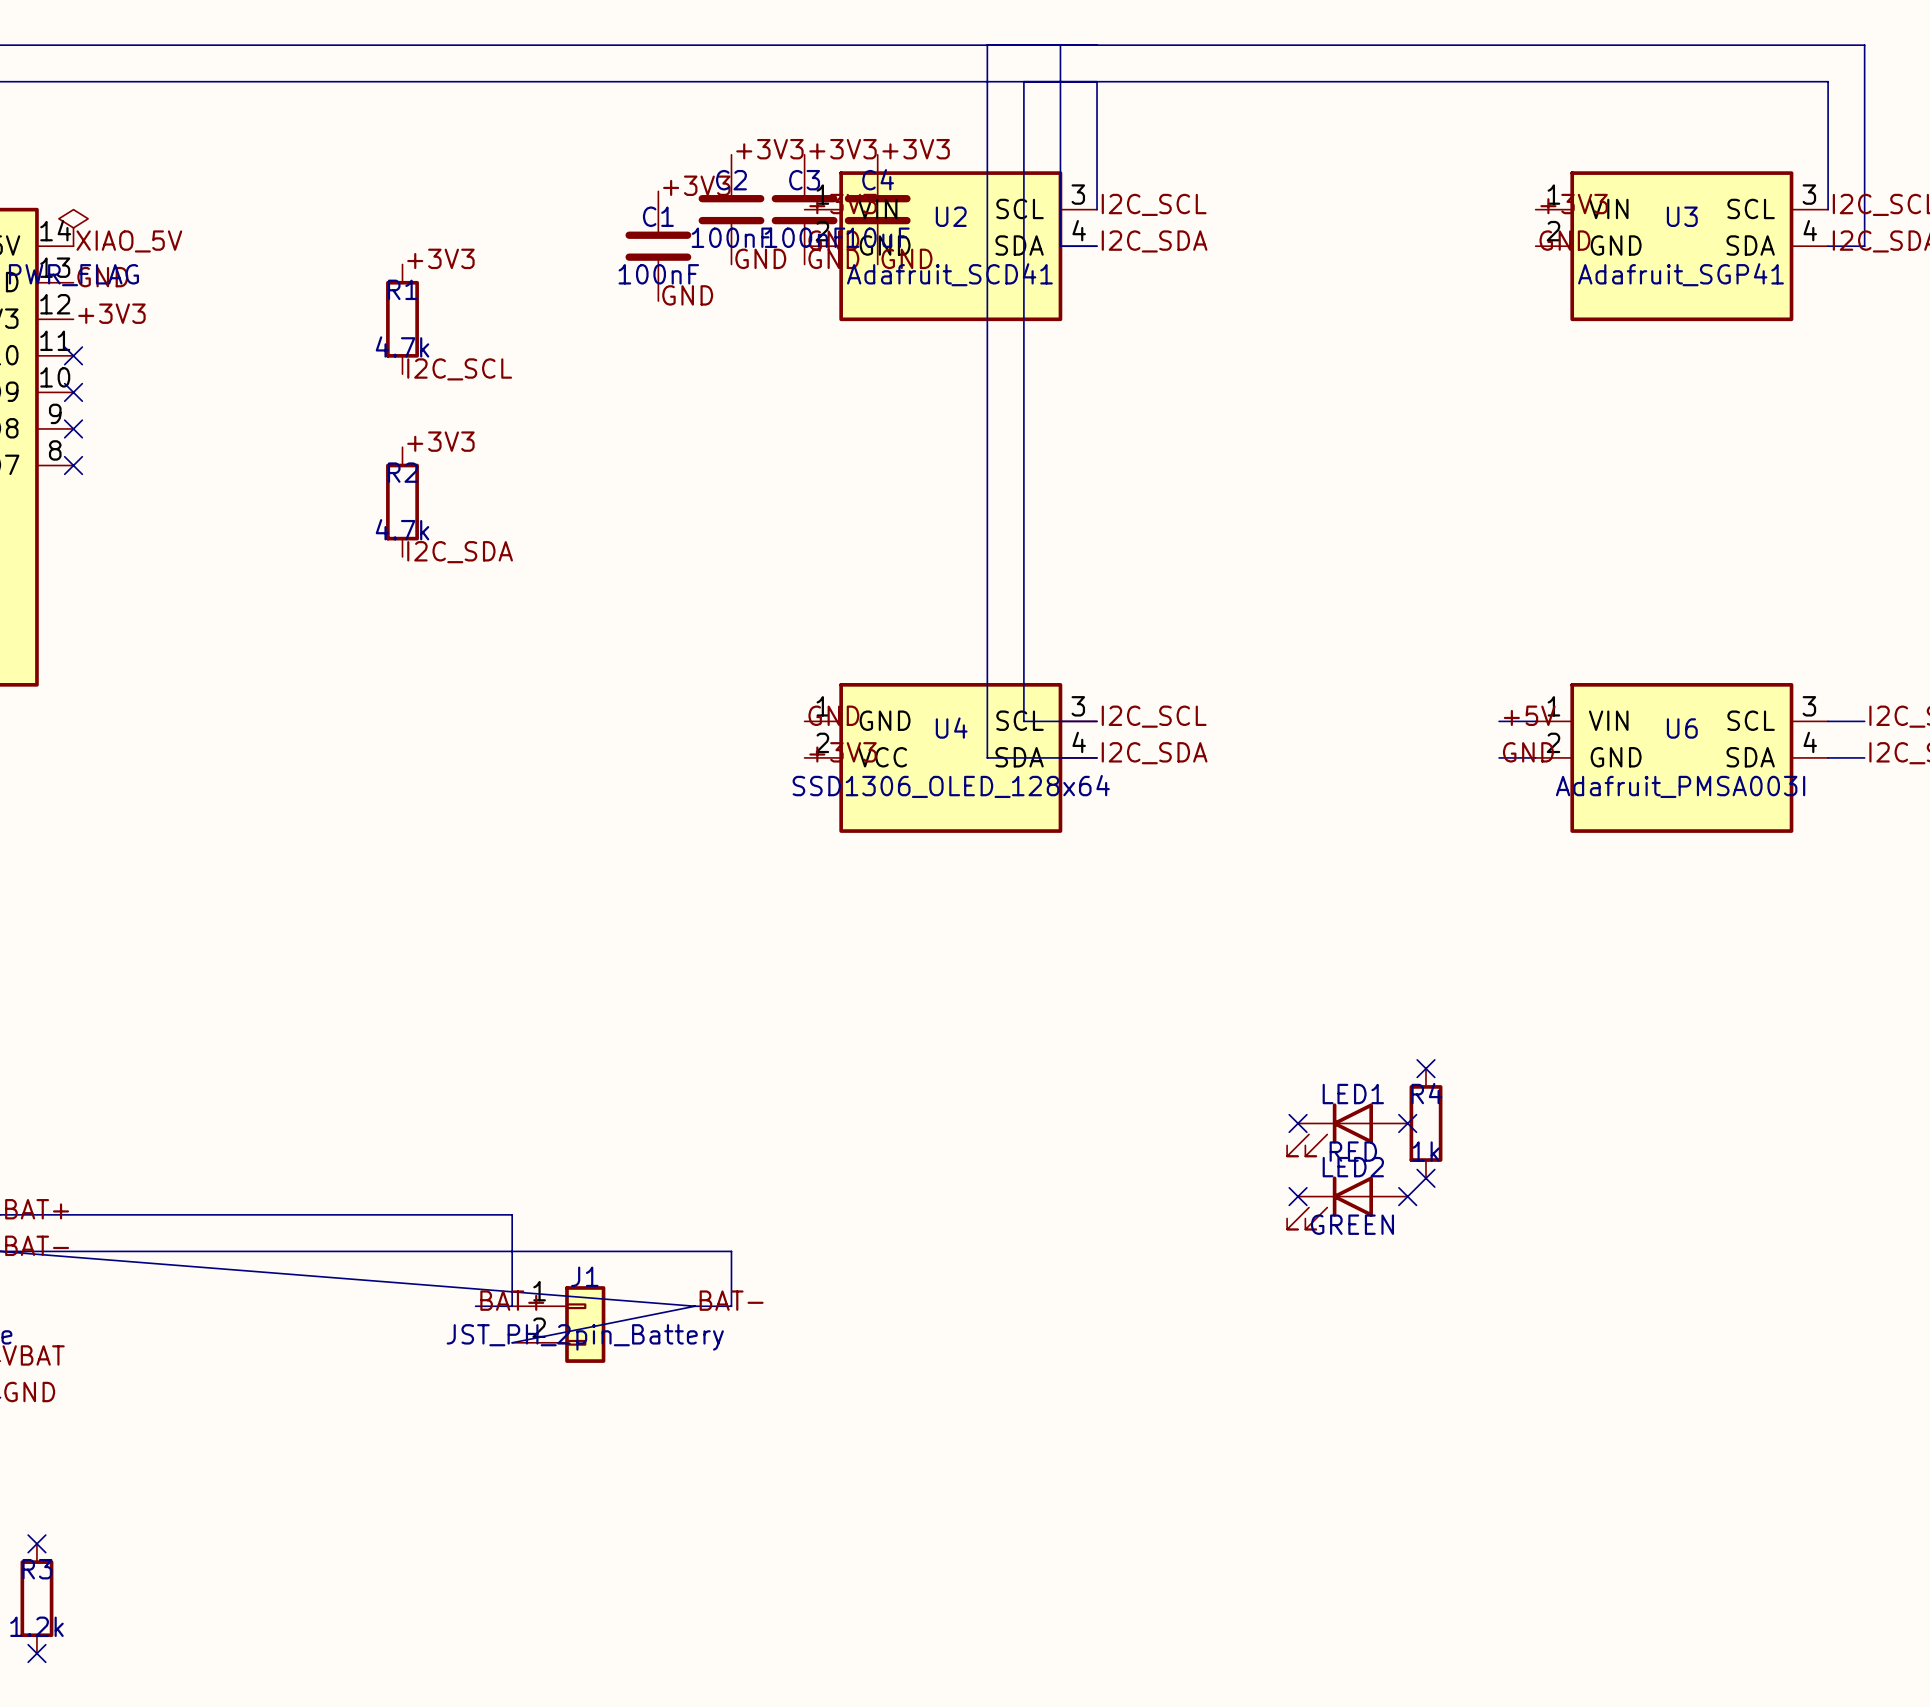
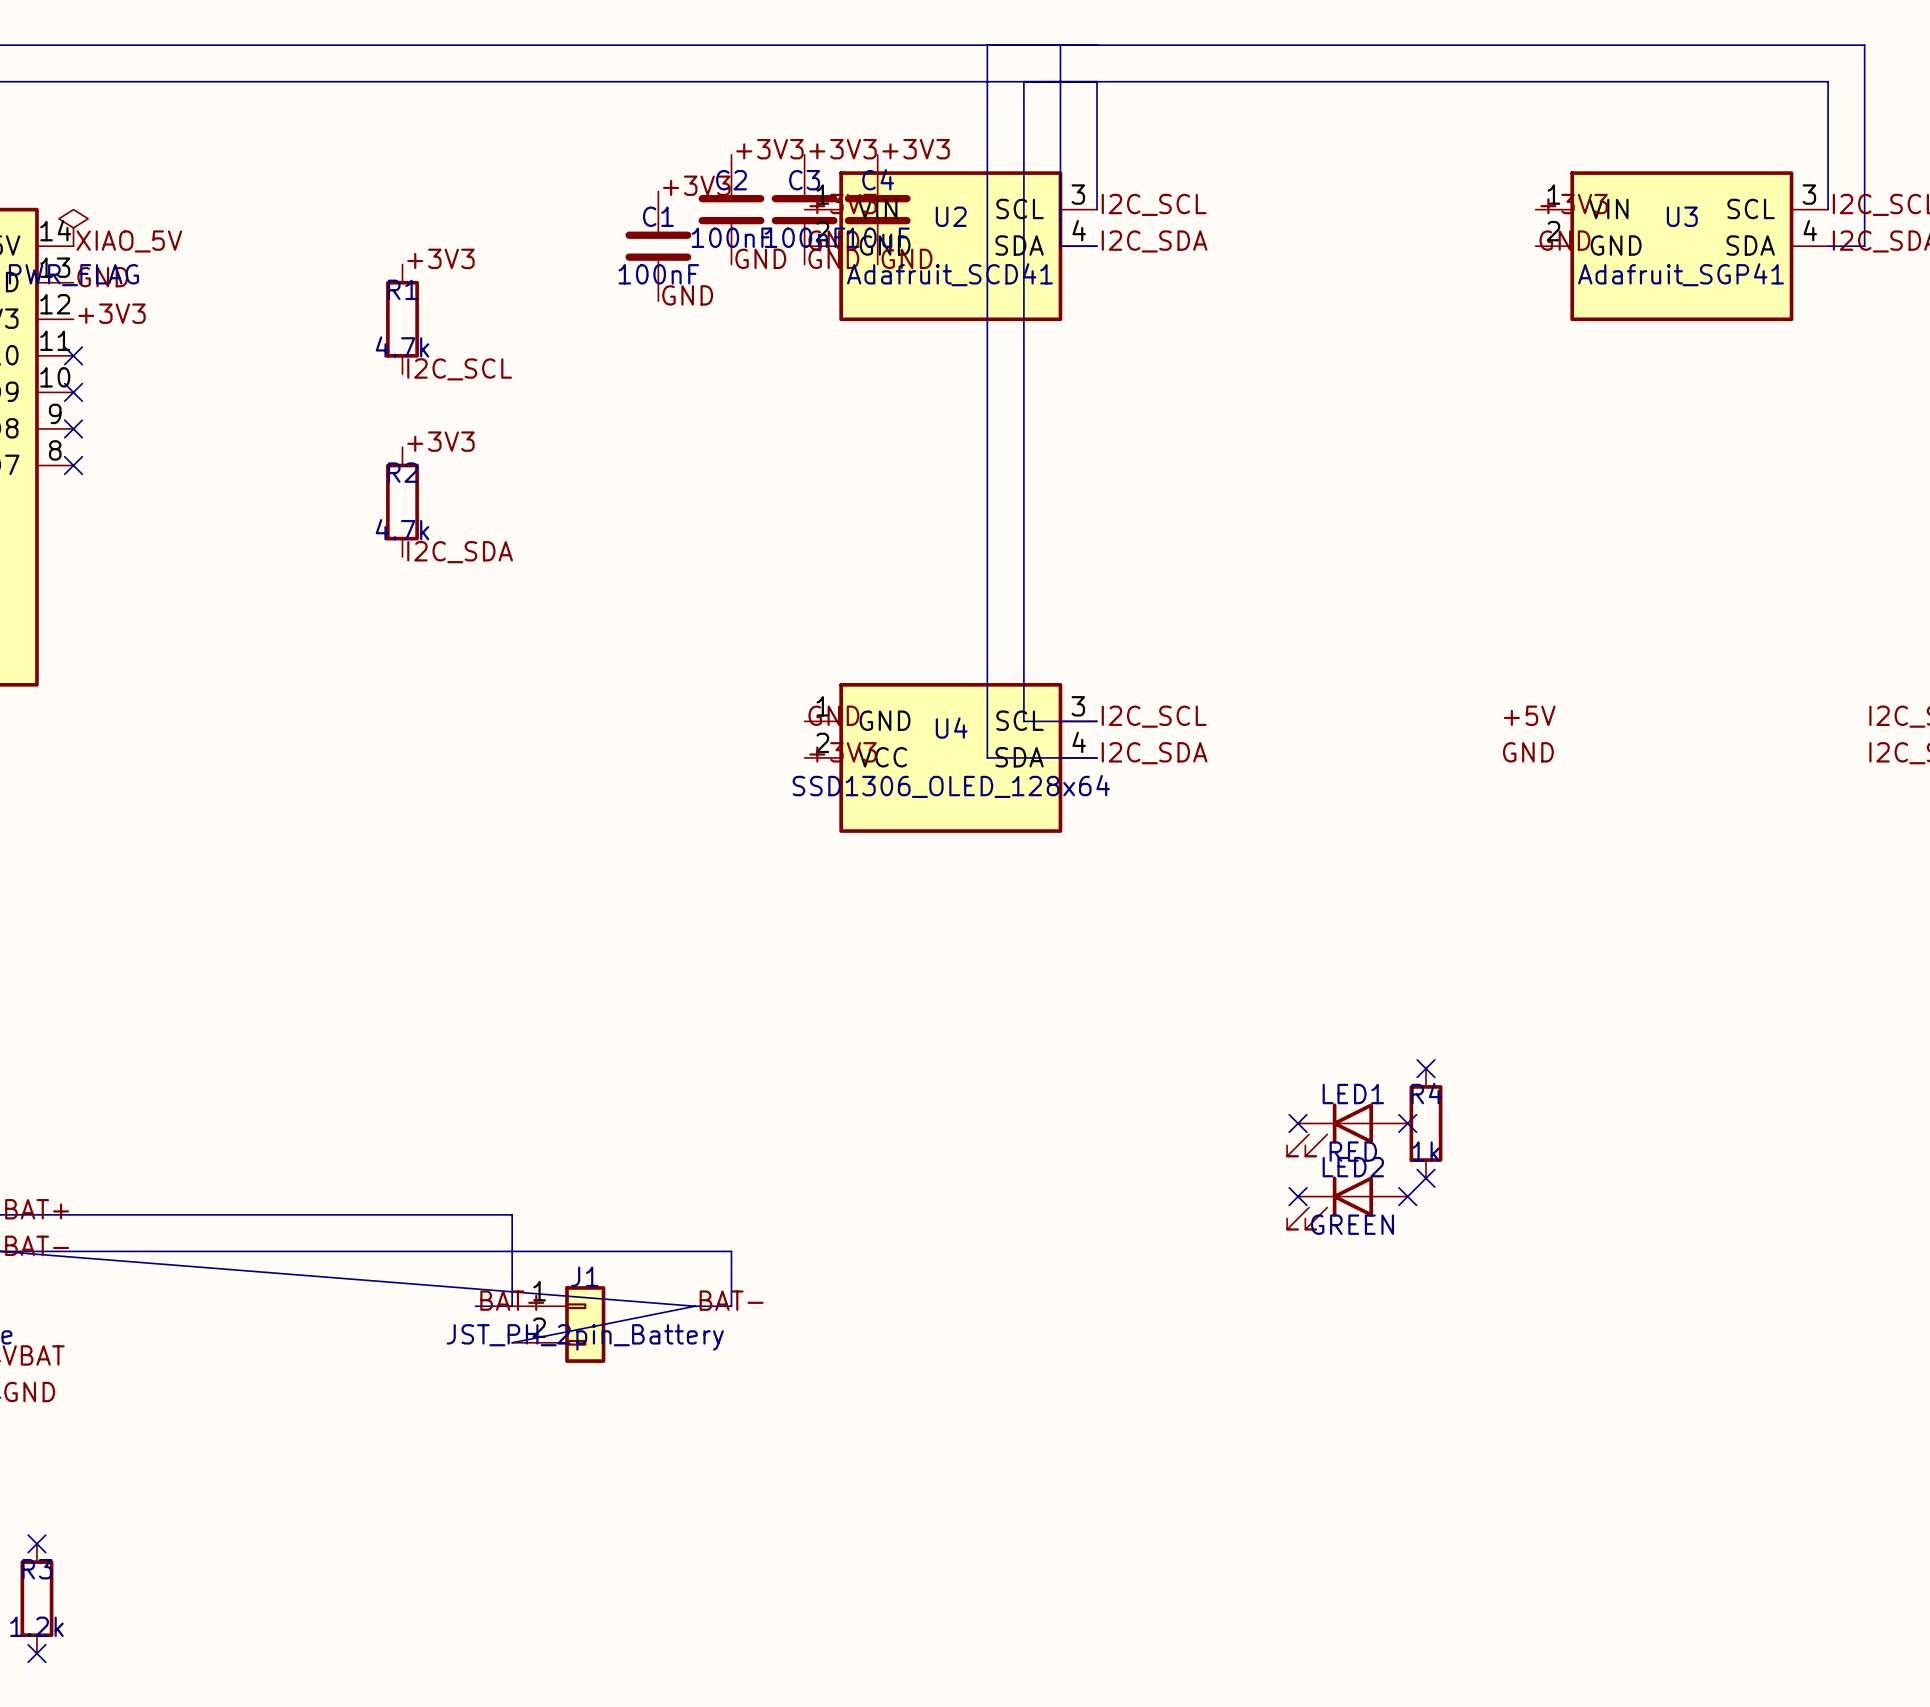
wire: (1499, 721) (1535, 721) -> none
wire: (1828, 721) (1864, 721) -> none
wire: (1499, 757) (1535, 757) -> none
U6: Adafruit_PMSA003I (1681, 757) -> none
wire: (1828, 757) (1864, 757) -> none

